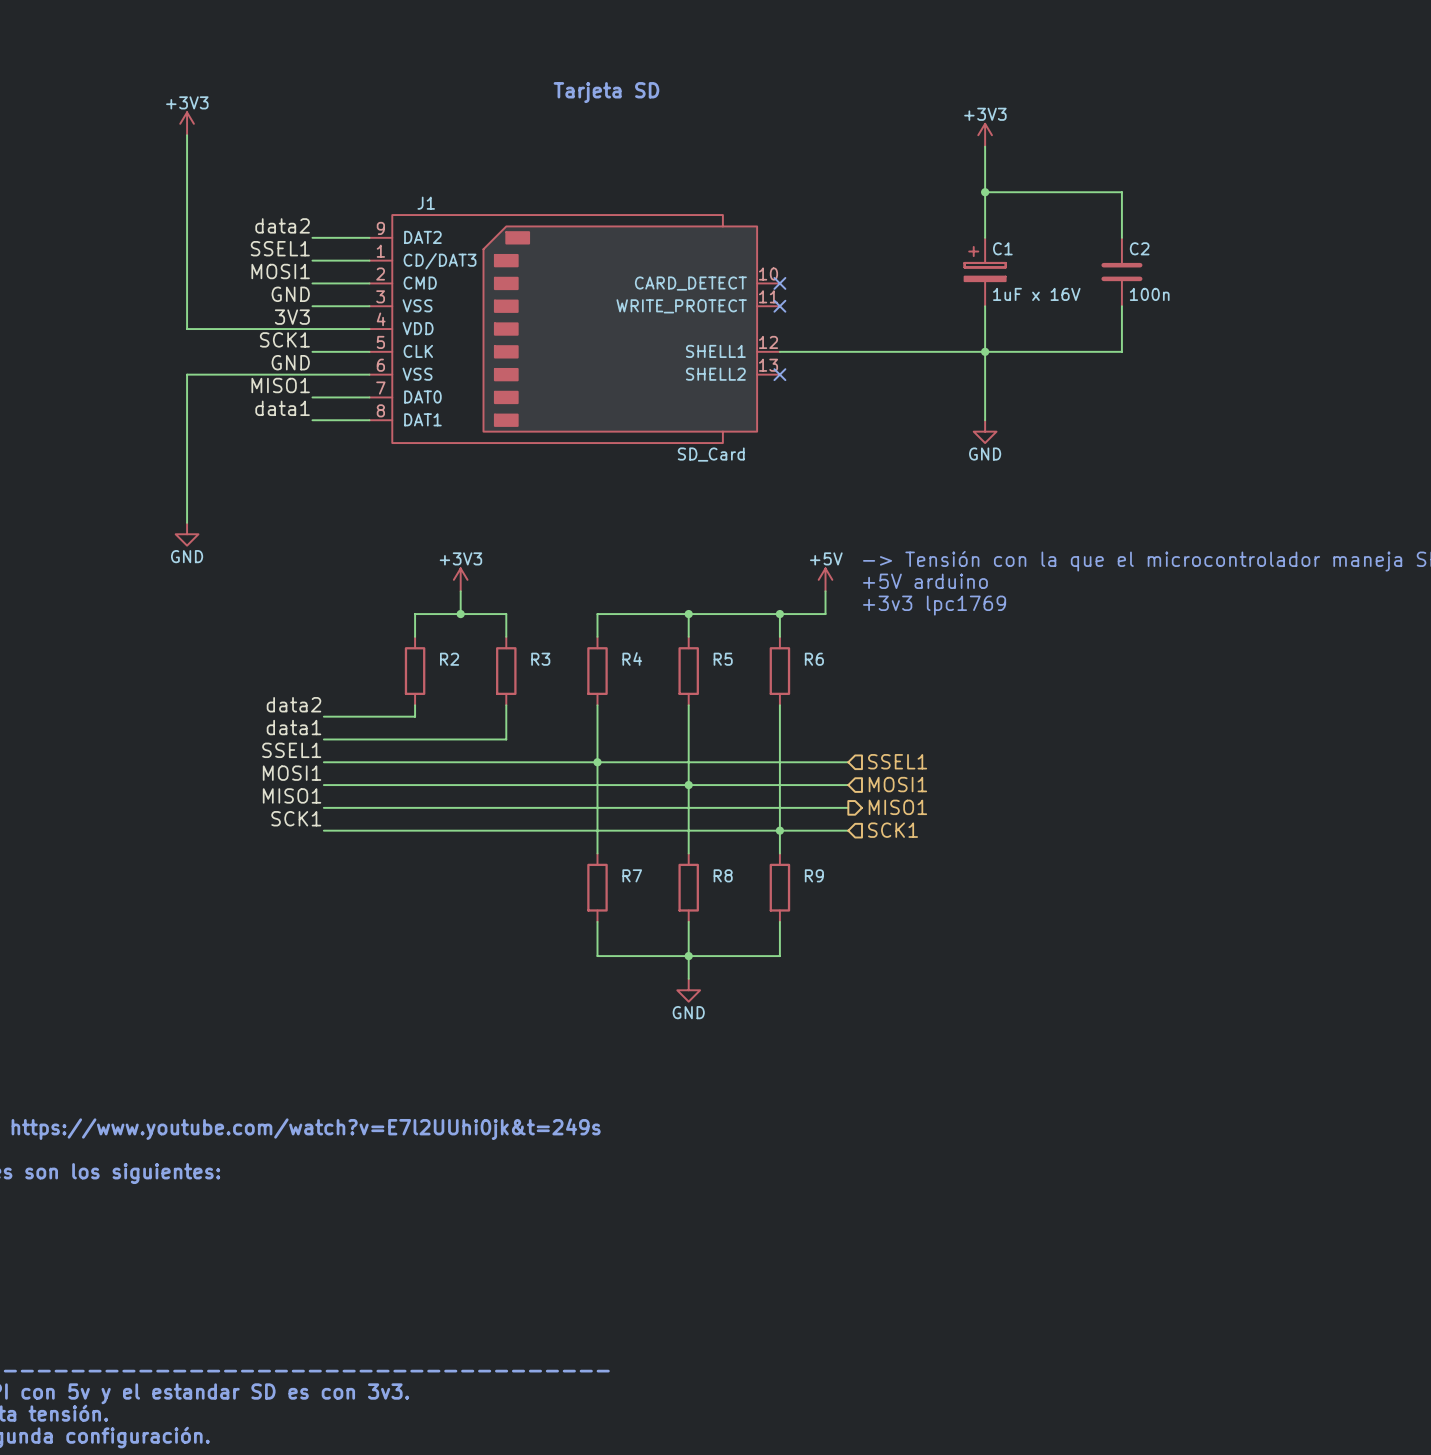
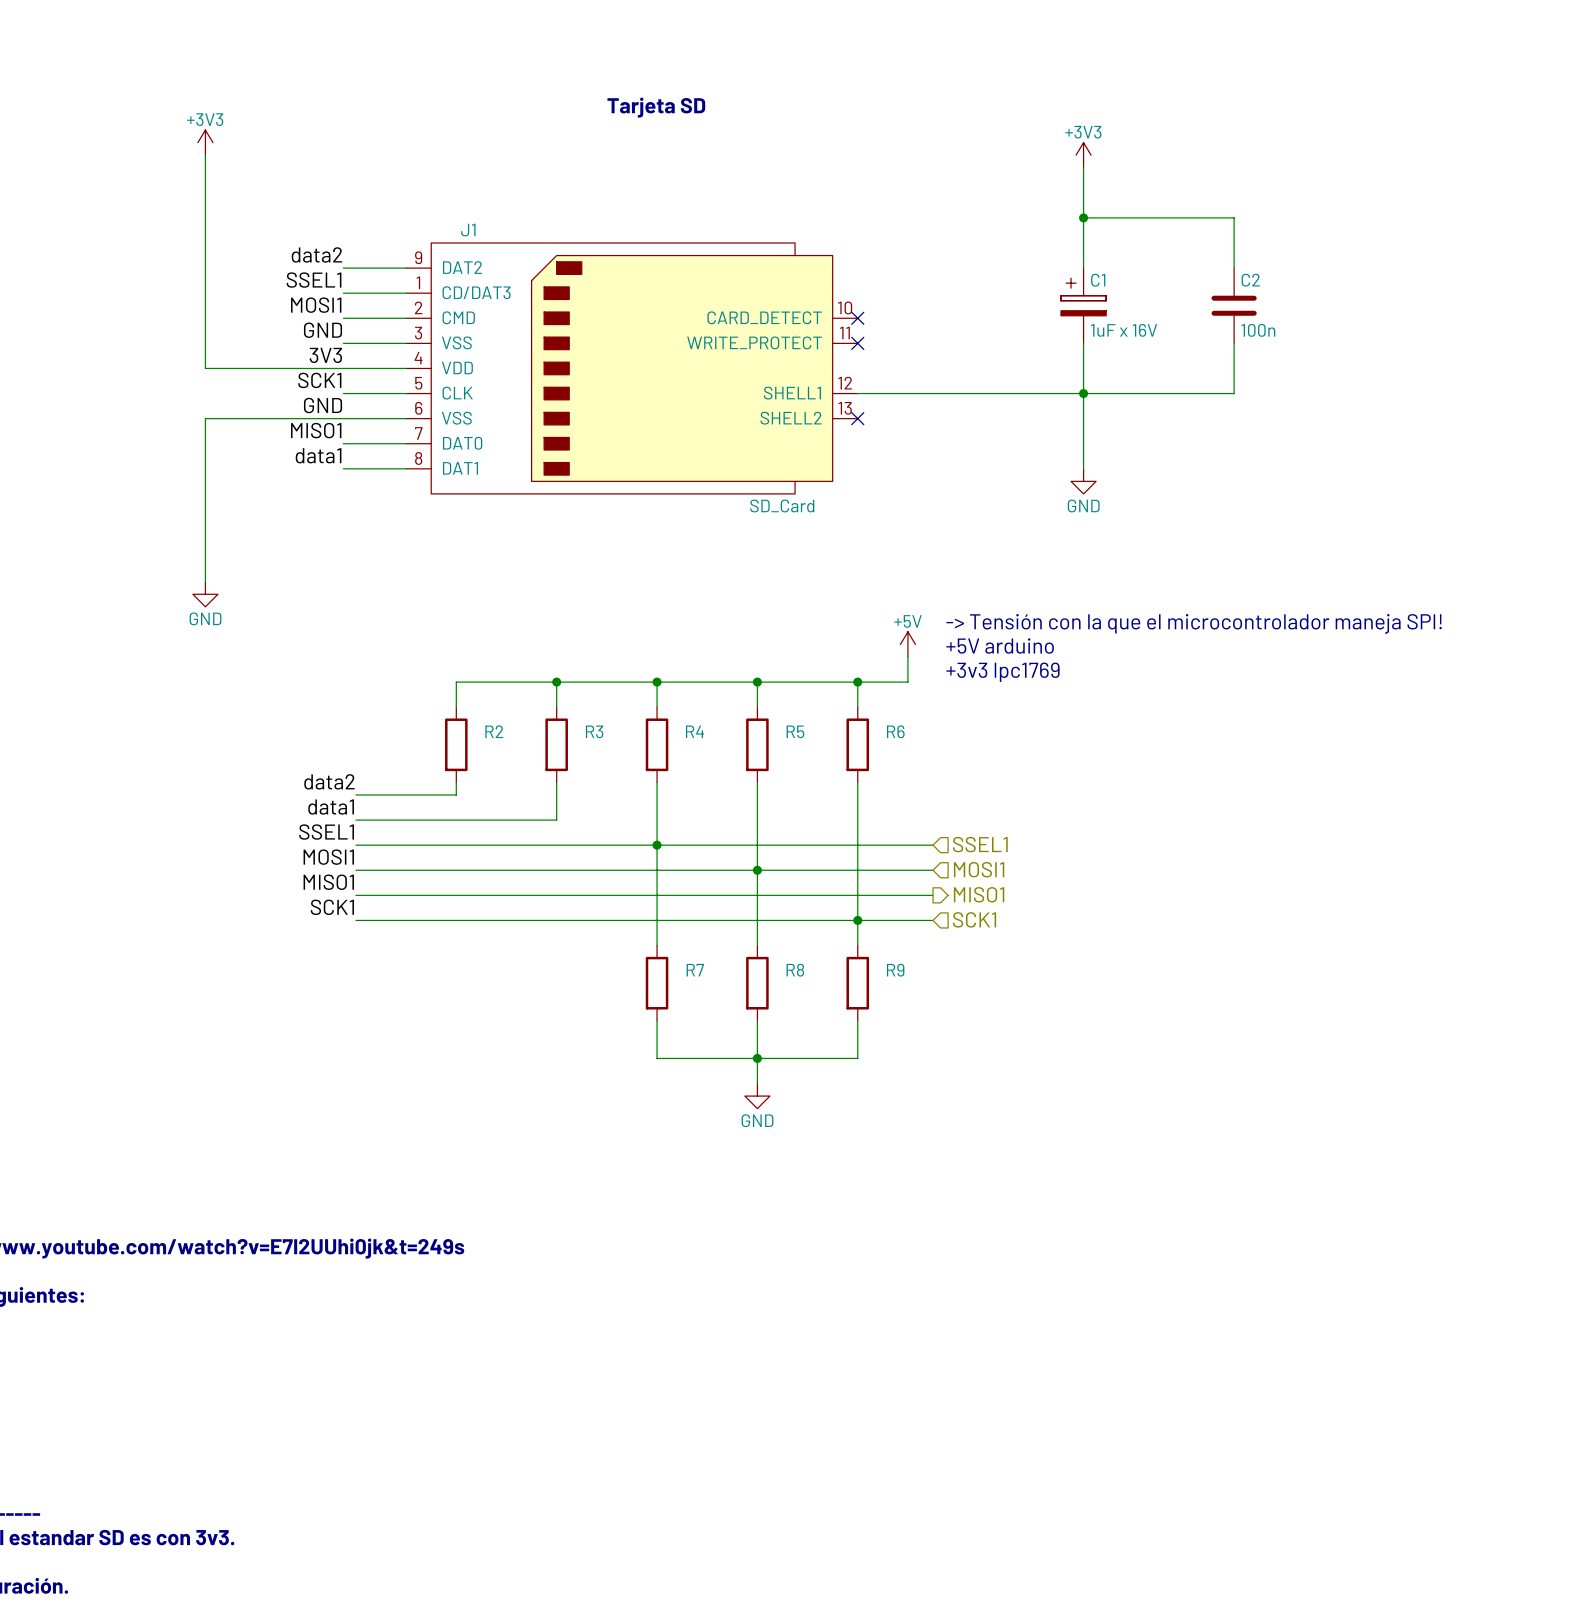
power symbol: +3V3 (460, 579) -> none
wire: (460, 591) (460, 614) -> none
junction position: (460, 614) -> (556, 682)
wire: none -> (556, 682) (657, 682)
junction: none -> (657, 682)

